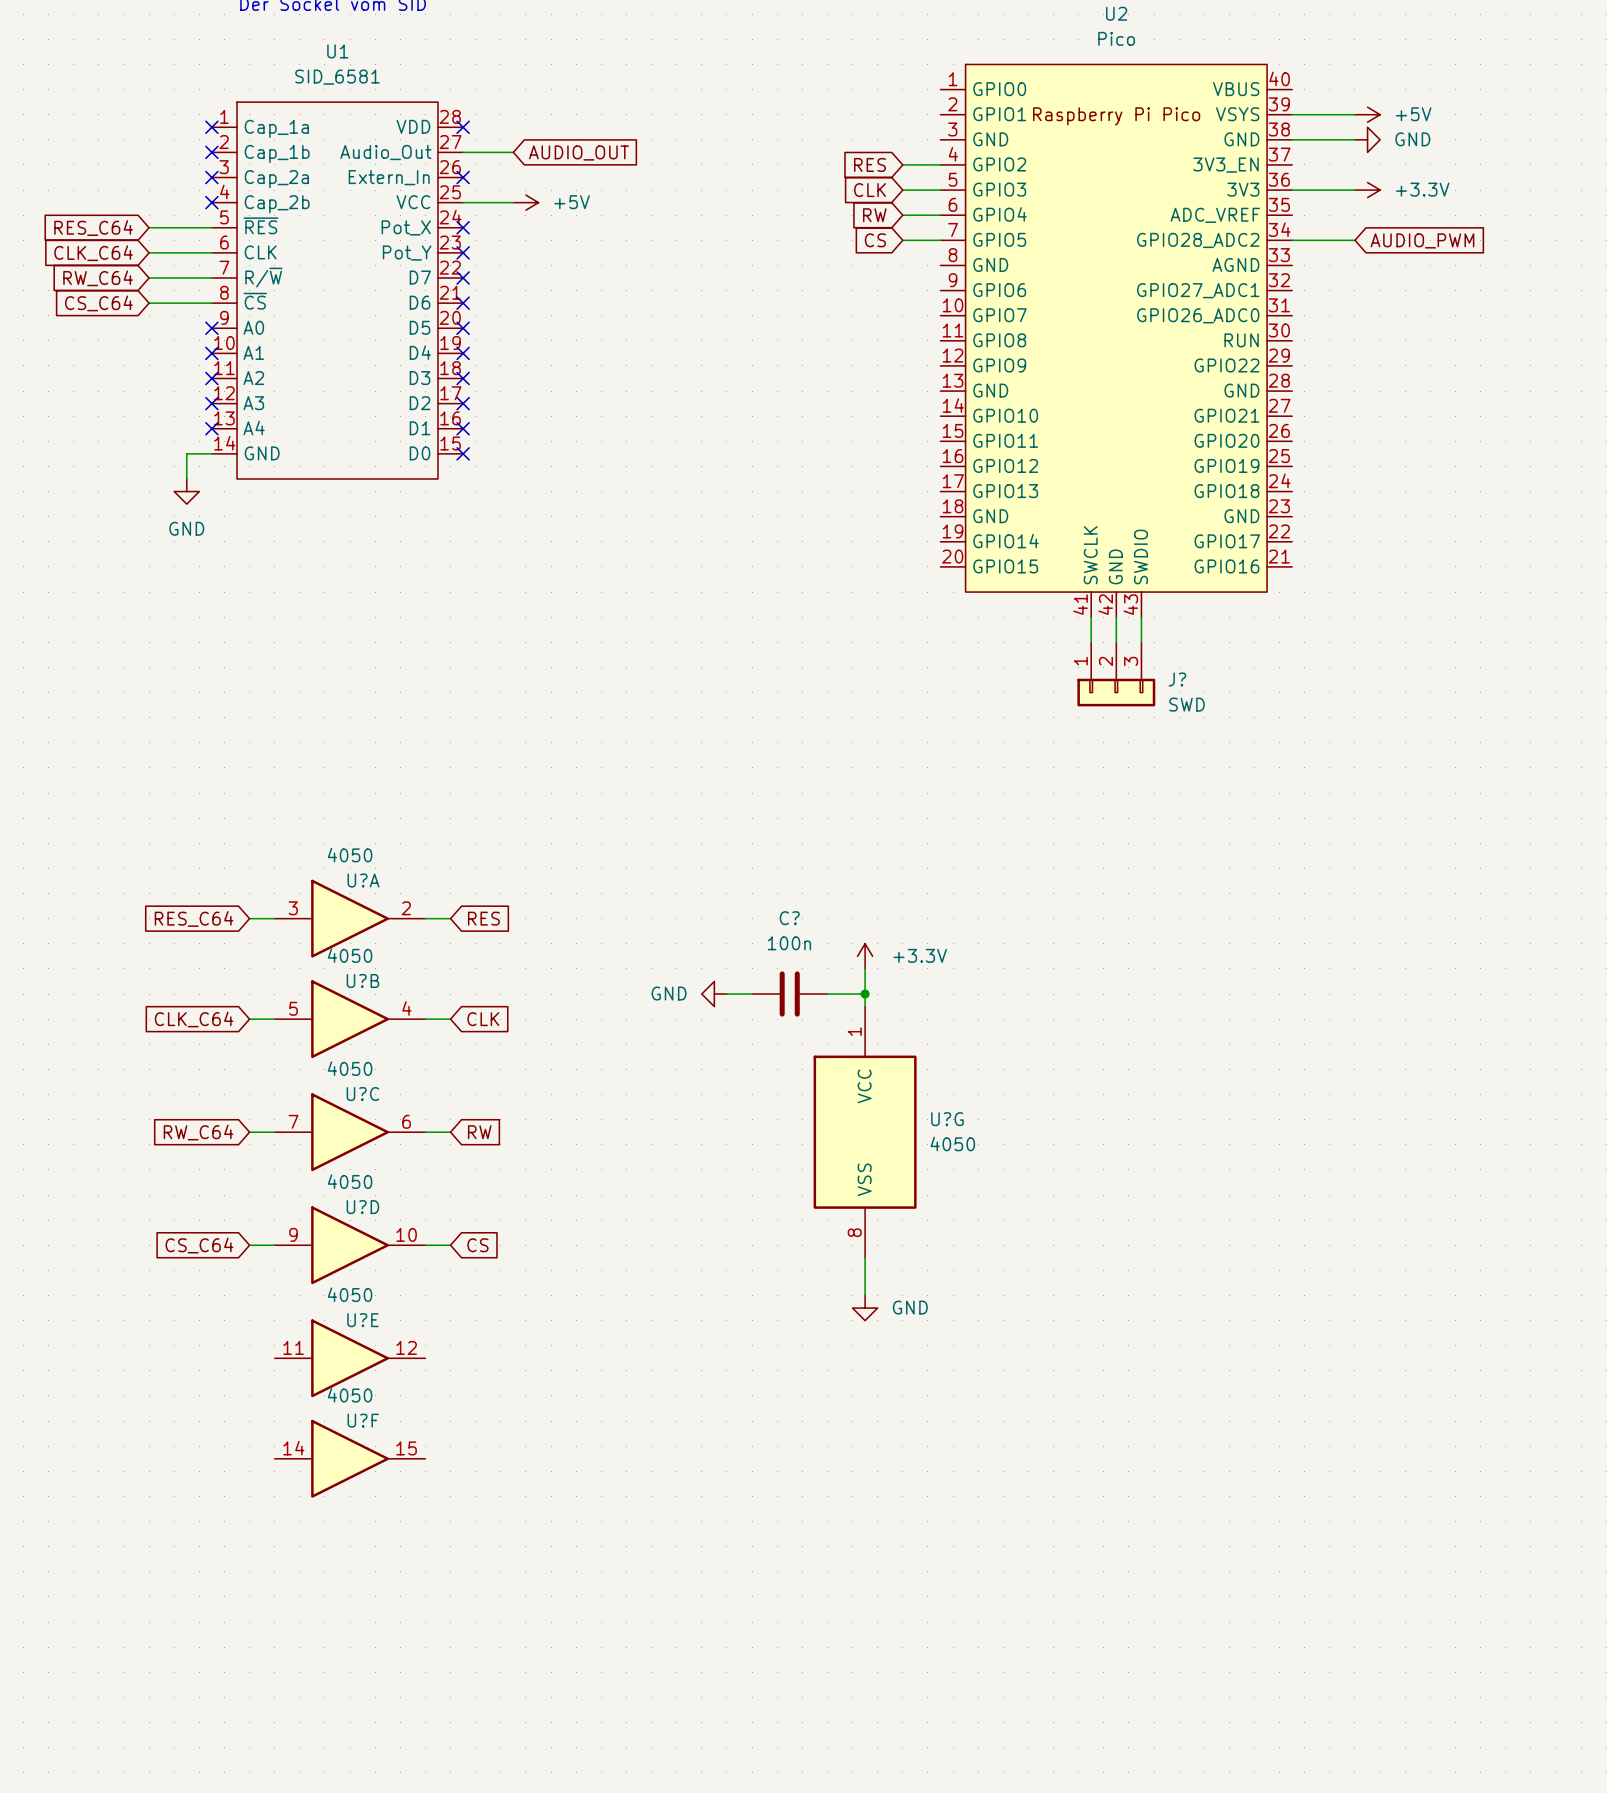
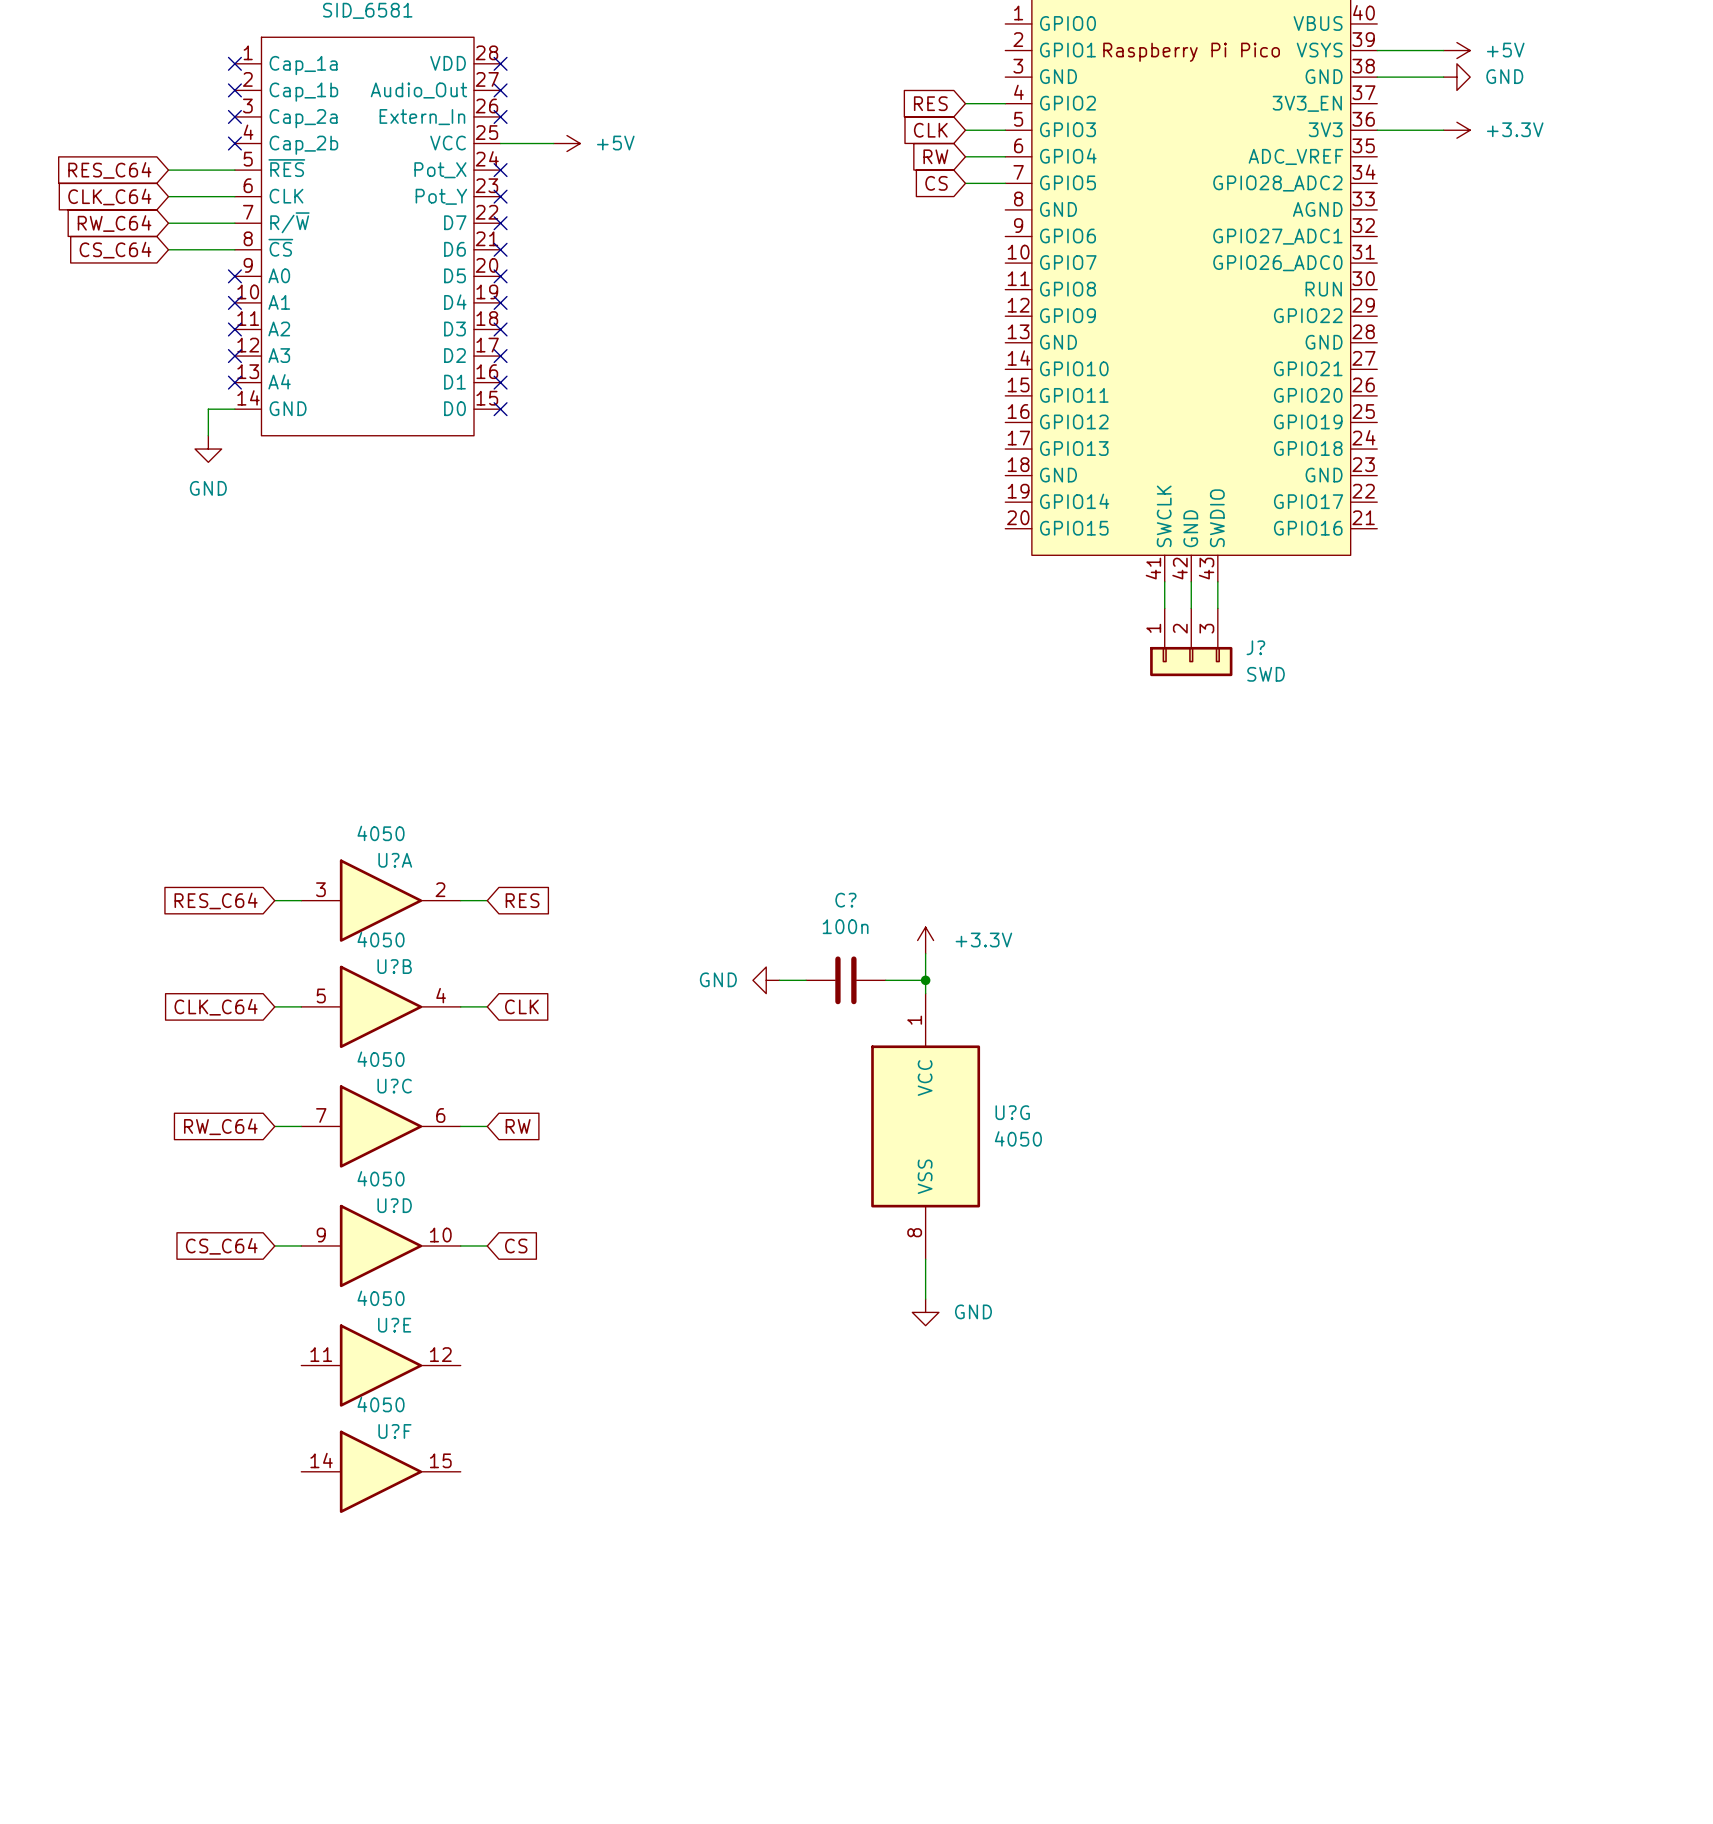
wire: (463, 152) (513, 152) -> none
no-connect mark: none -> (500, 90)
global label: AUDIO_OUT (579, 152) -> none
wire: (1292, 240) (1354, 240) -> none
global label: AUDIO_PWM (1422, 240) -> none

